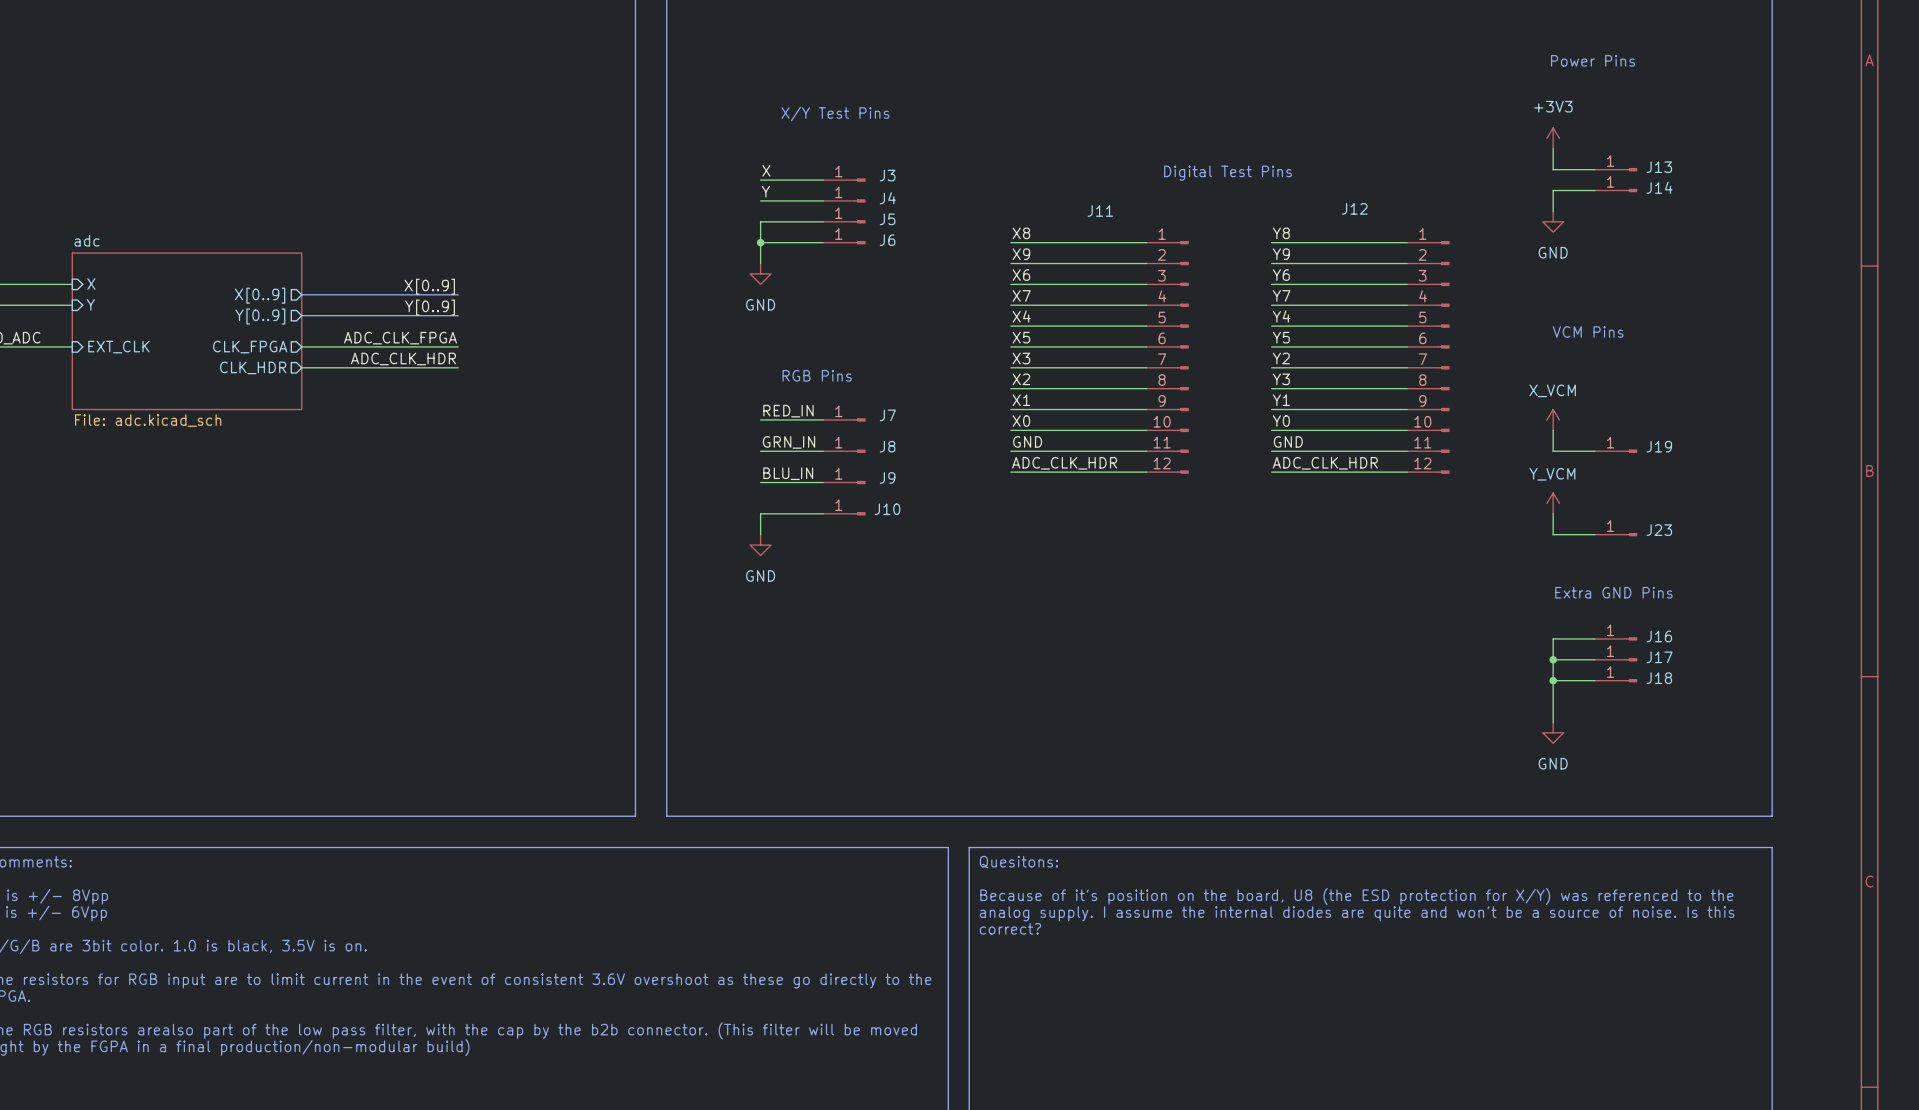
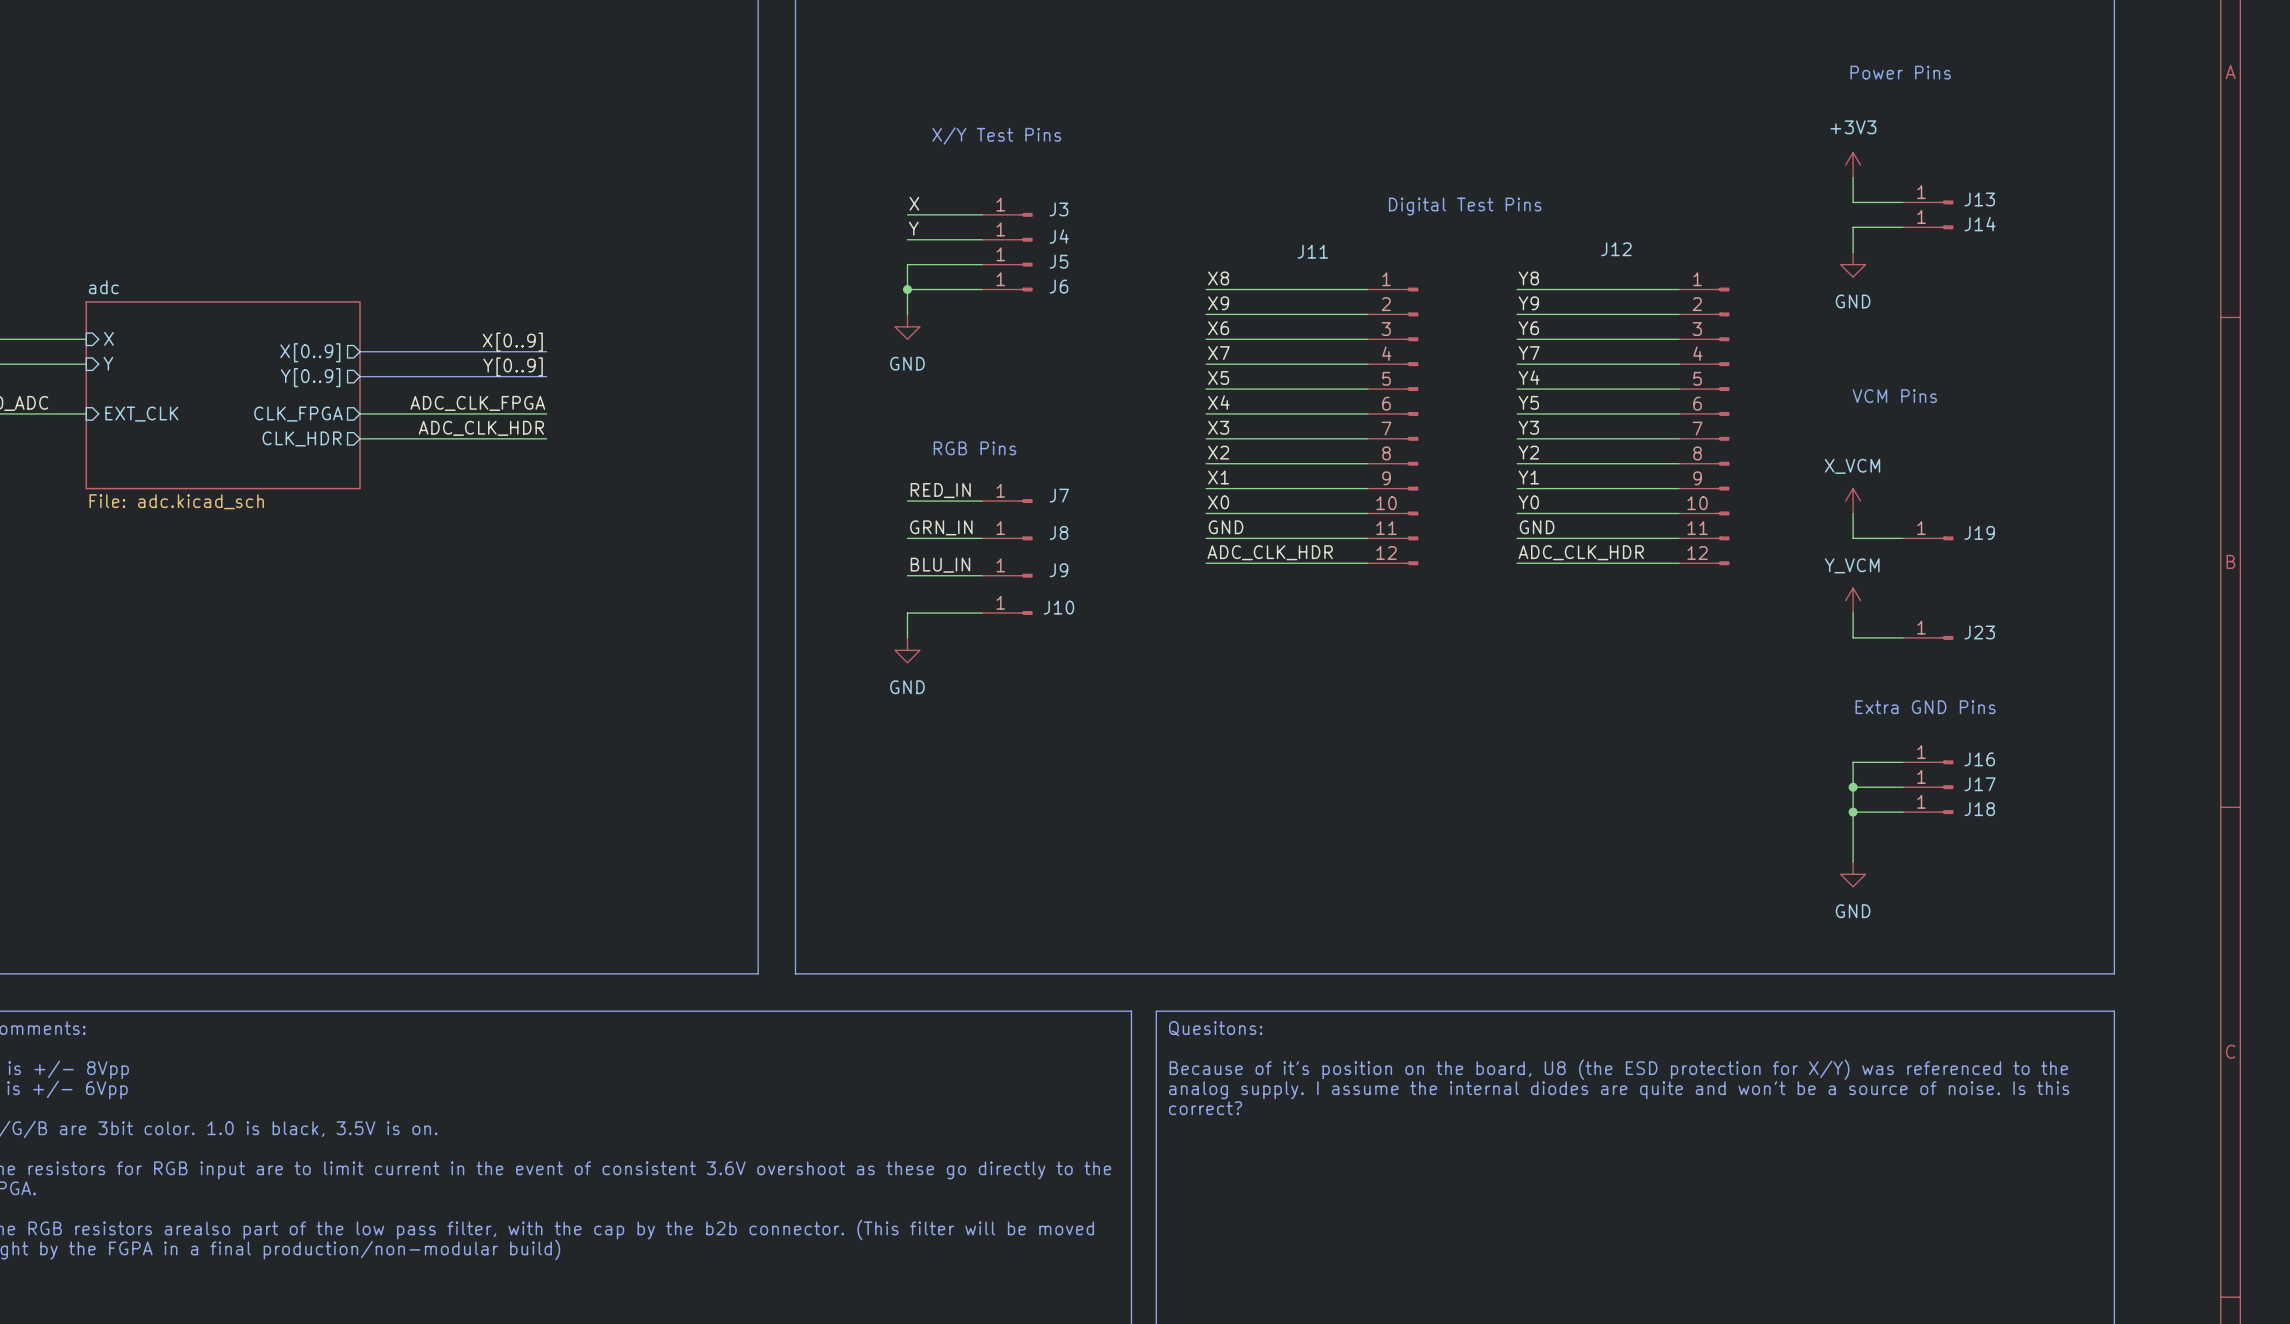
label: X4 (1021, 316) -> X5 (1218, 377)
label: X5 (1021, 337) -> X4 (1218, 402)
label: Y2 (1281, 358) -> Y3 (1528, 427)
label: Y3 (1281, 379) -> Y2 (1528, 452)

